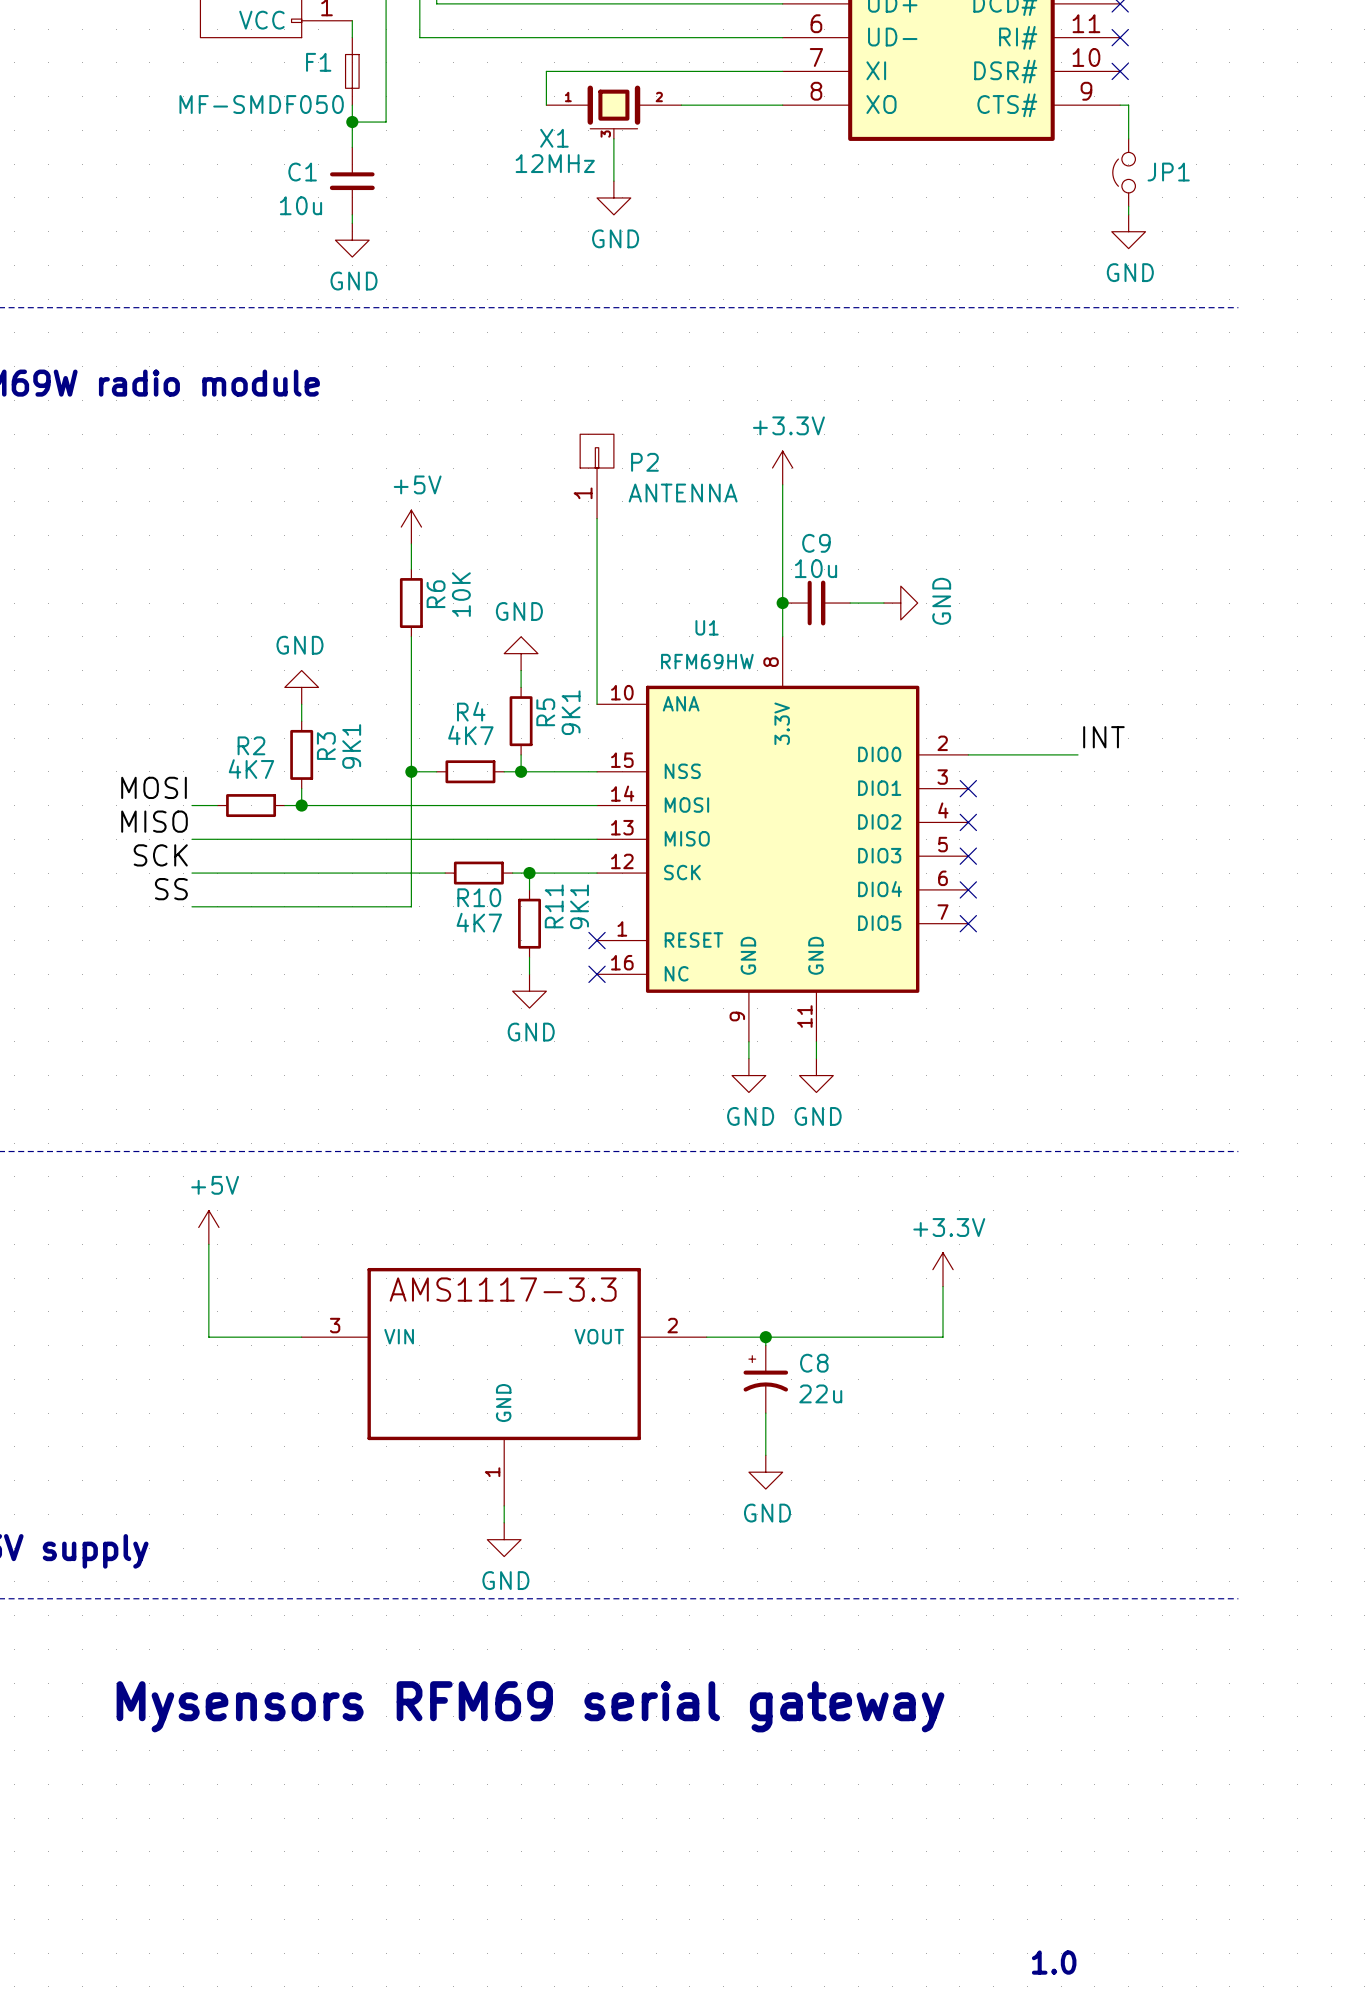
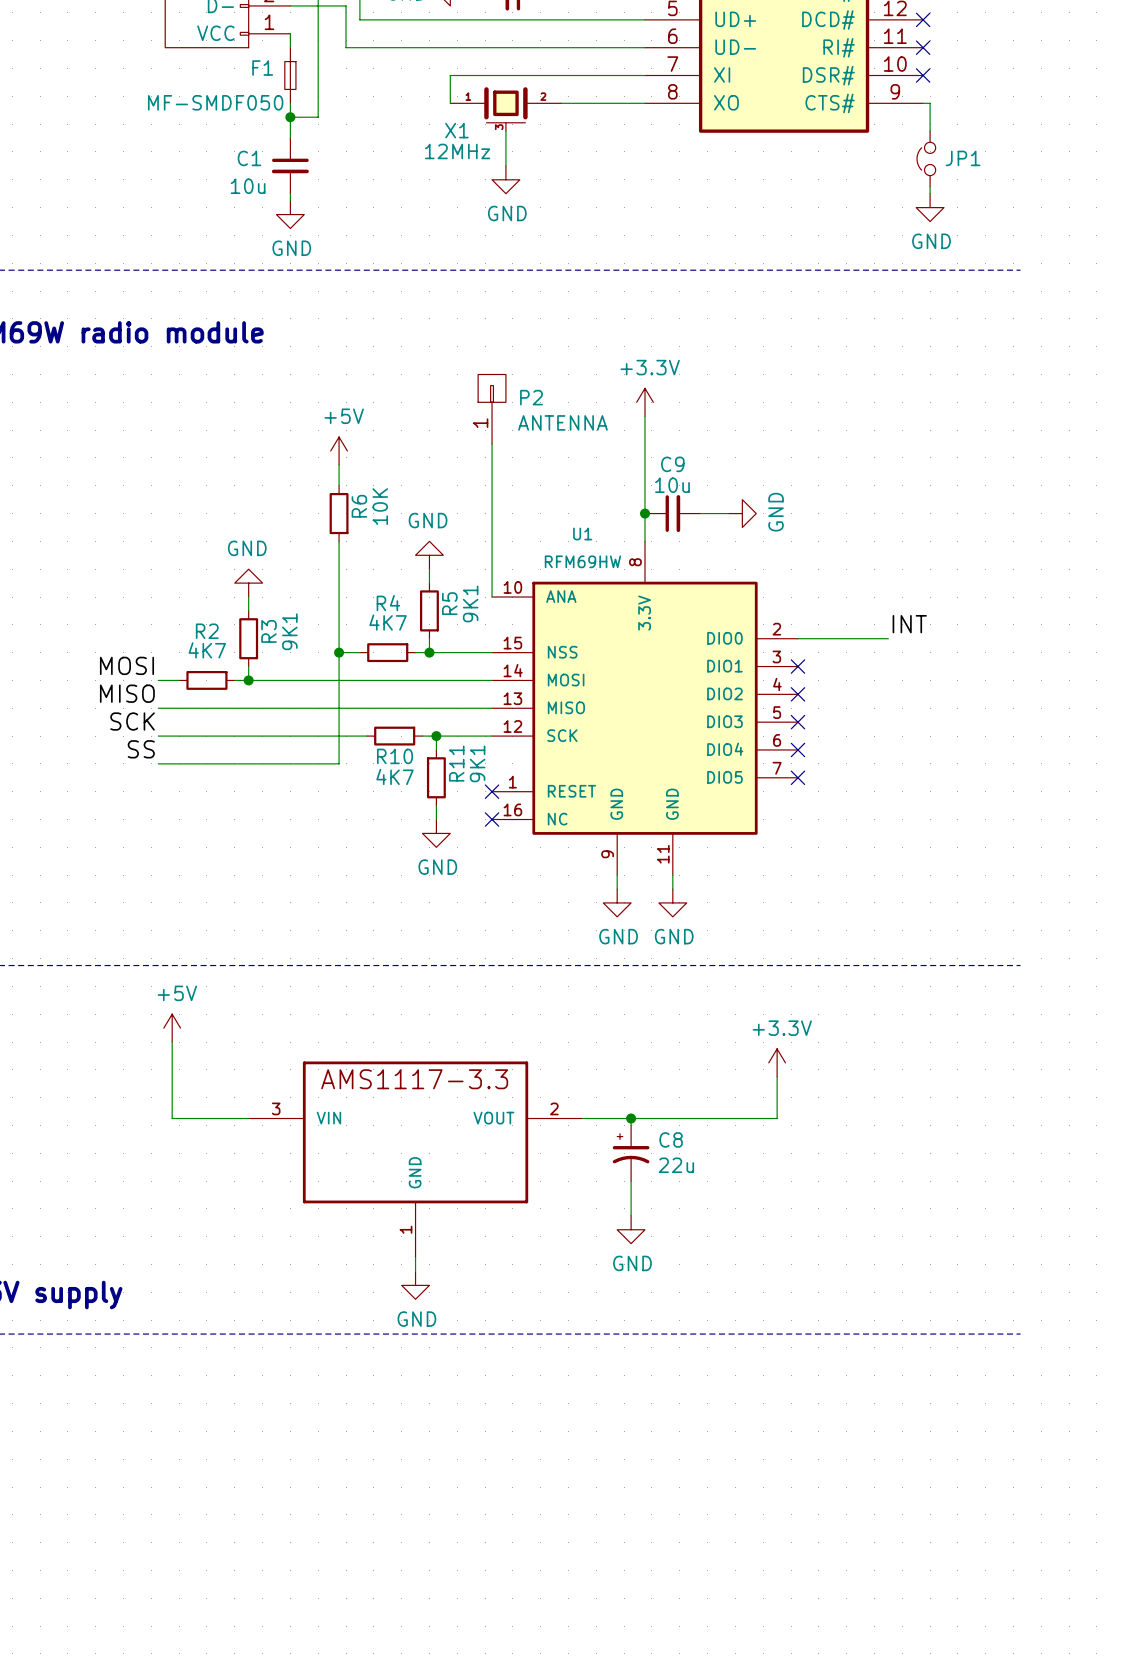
text: Mysensors RFM69 serial gateway (530, 1706) -> none
text: 1.0 (1054, 1962) -> none

